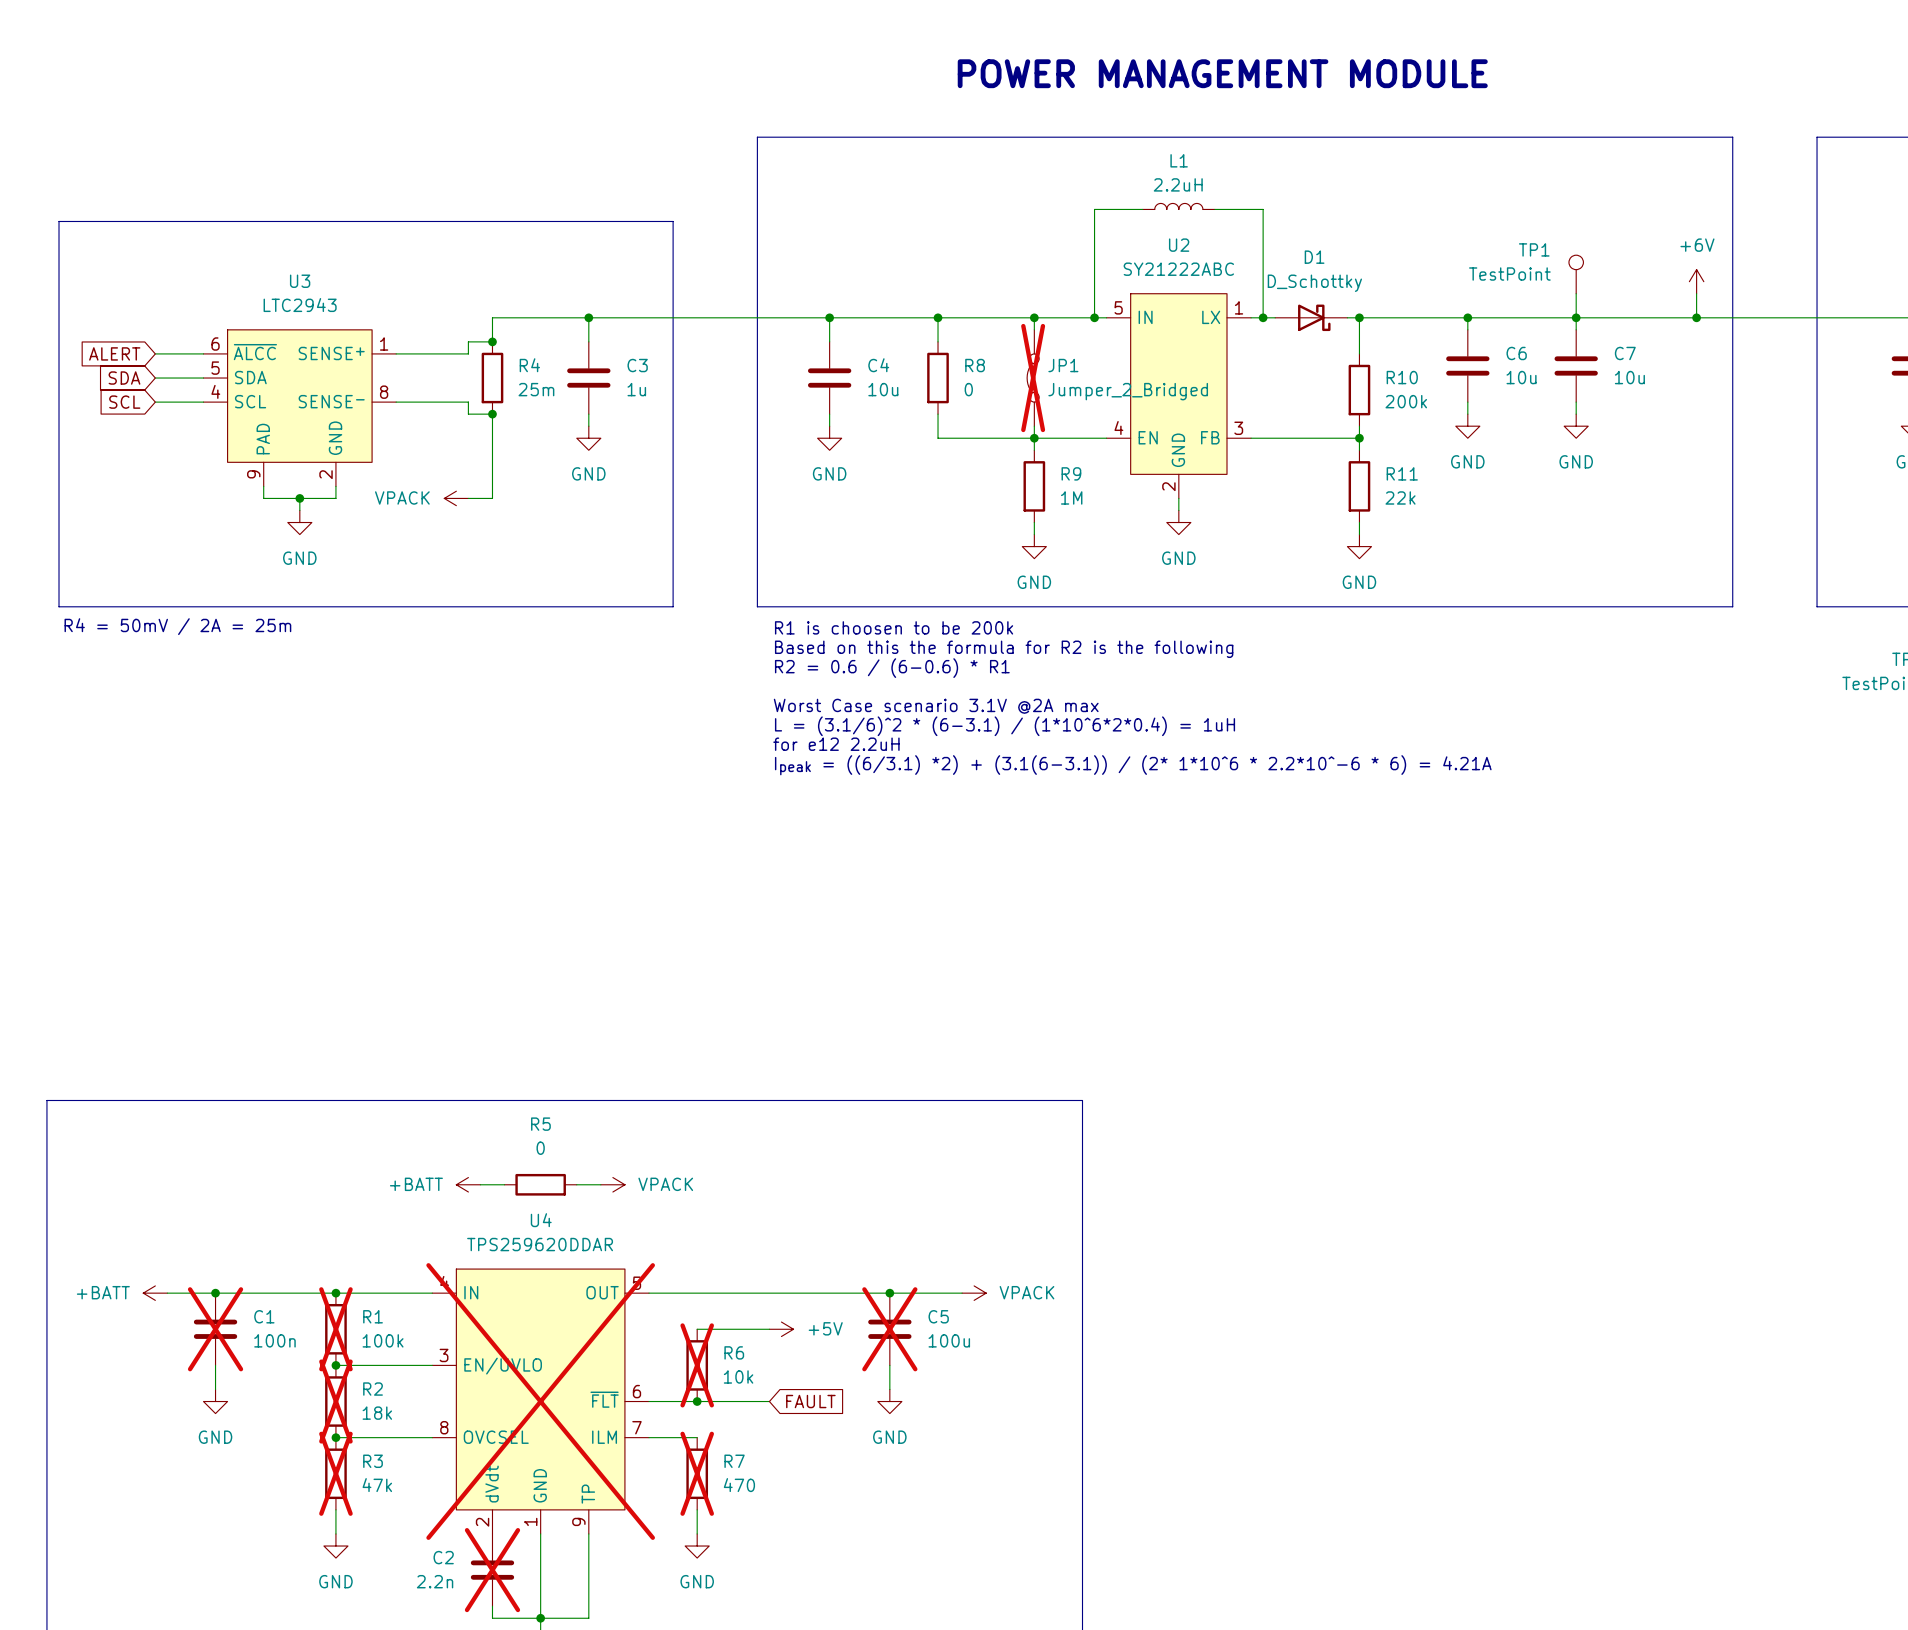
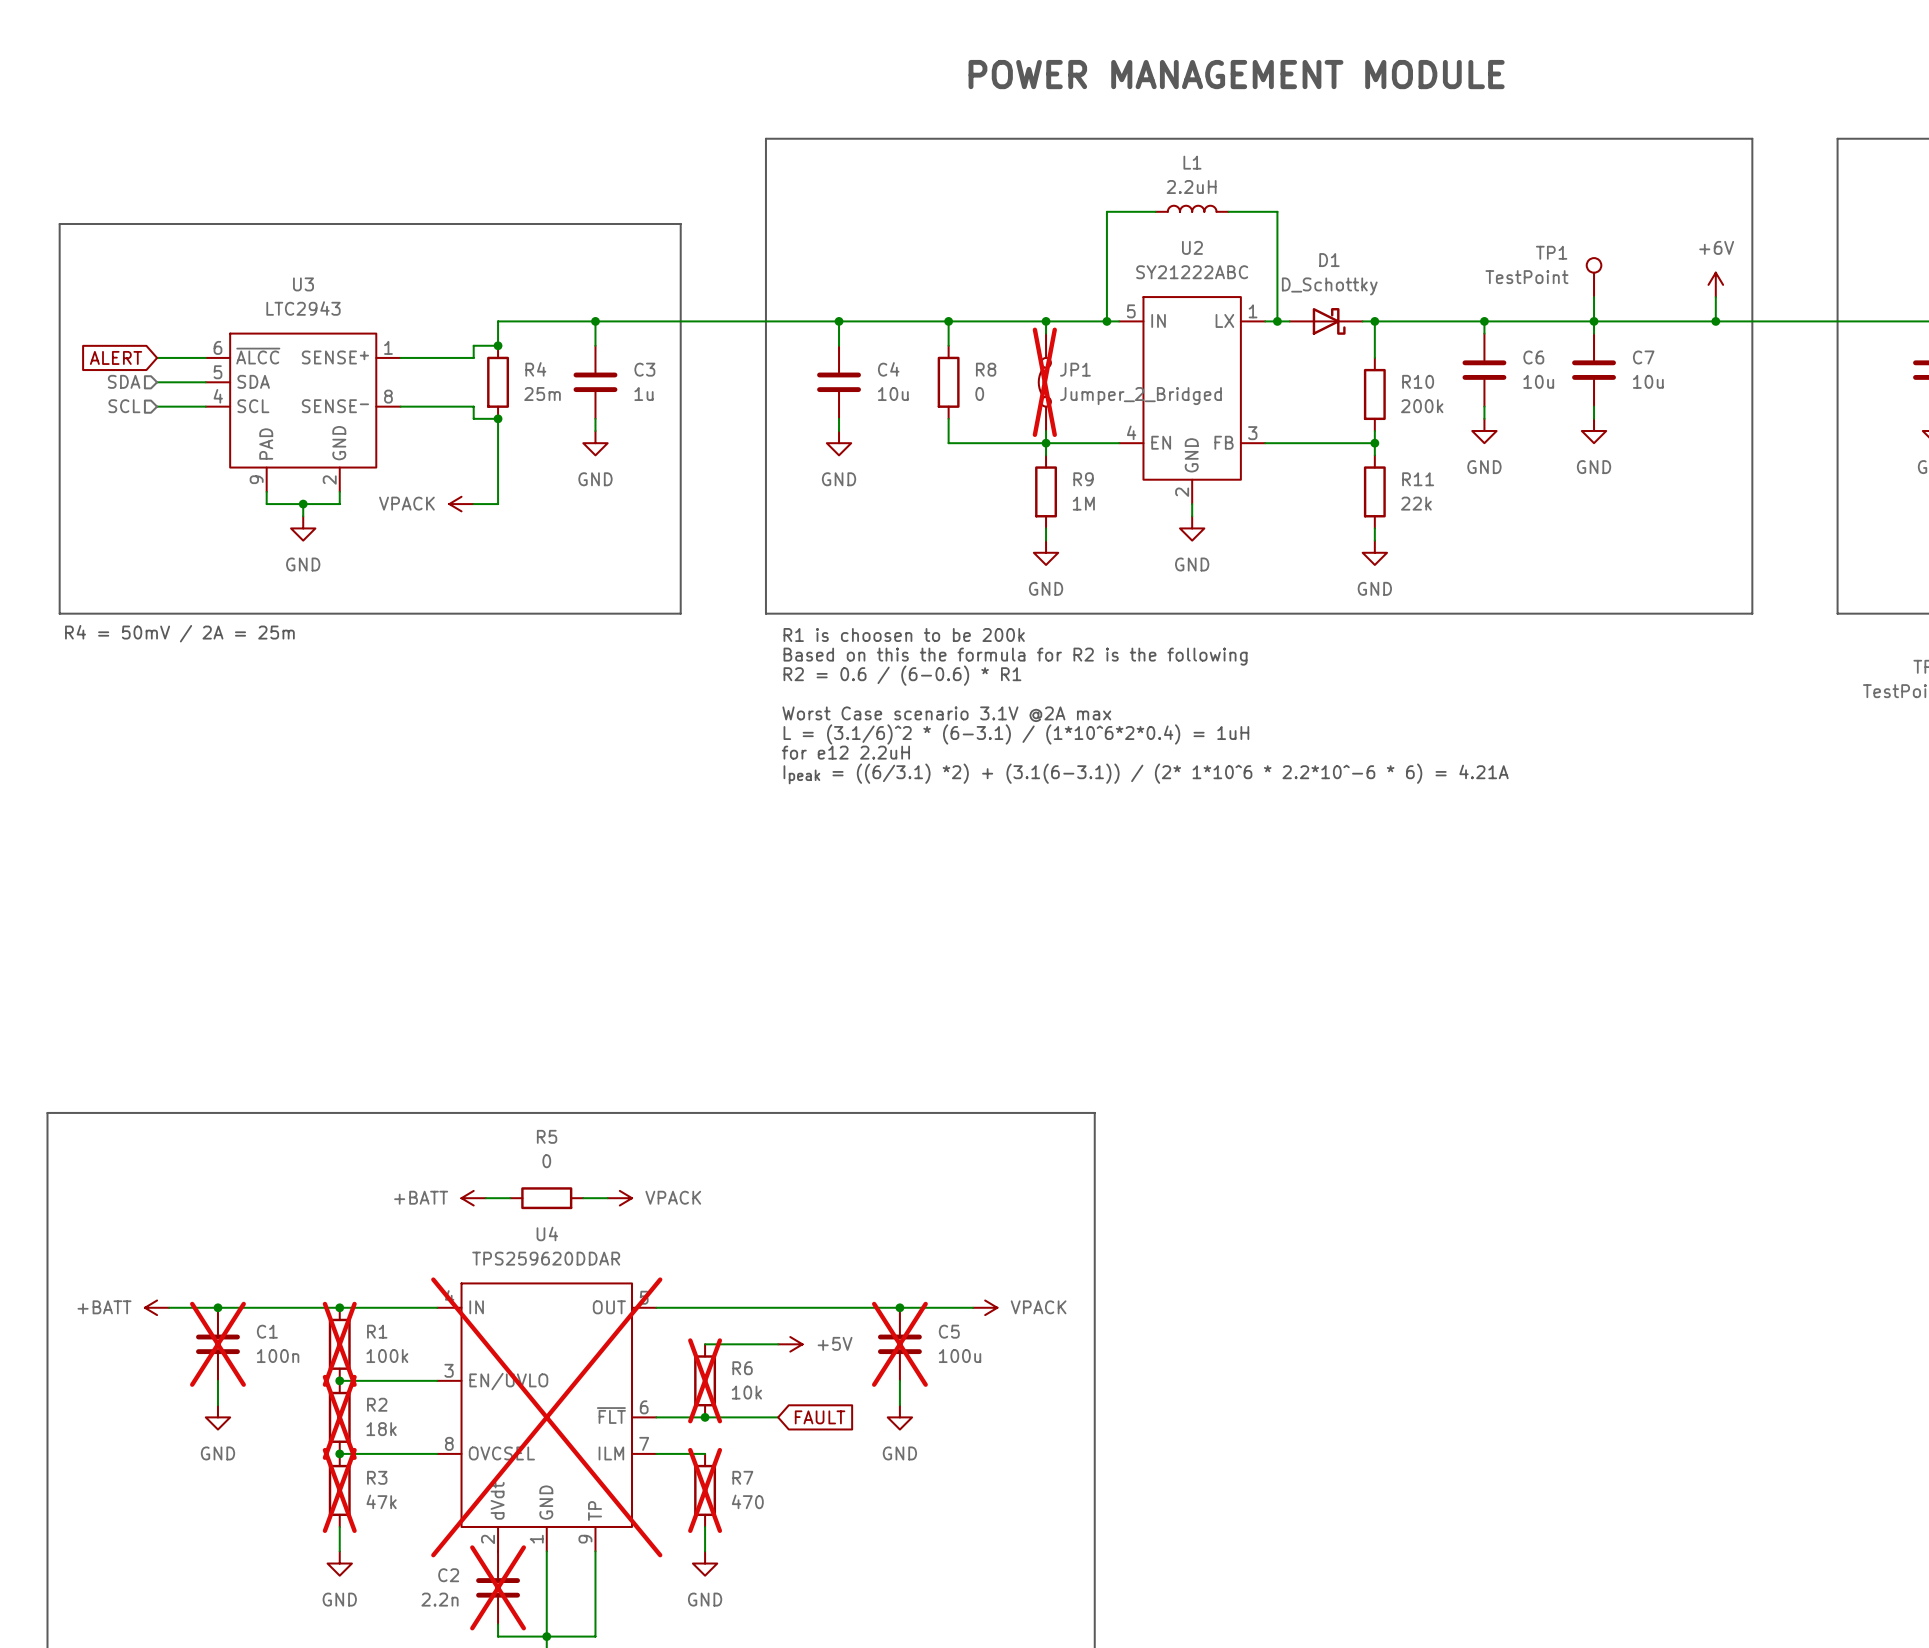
hierarchical label: none -> SDA (124, 381)
global label: SDA (124, 378) -> none
hierarchical label: none -> SCL (124, 406)
global label: SCL (124, 402) -> none

